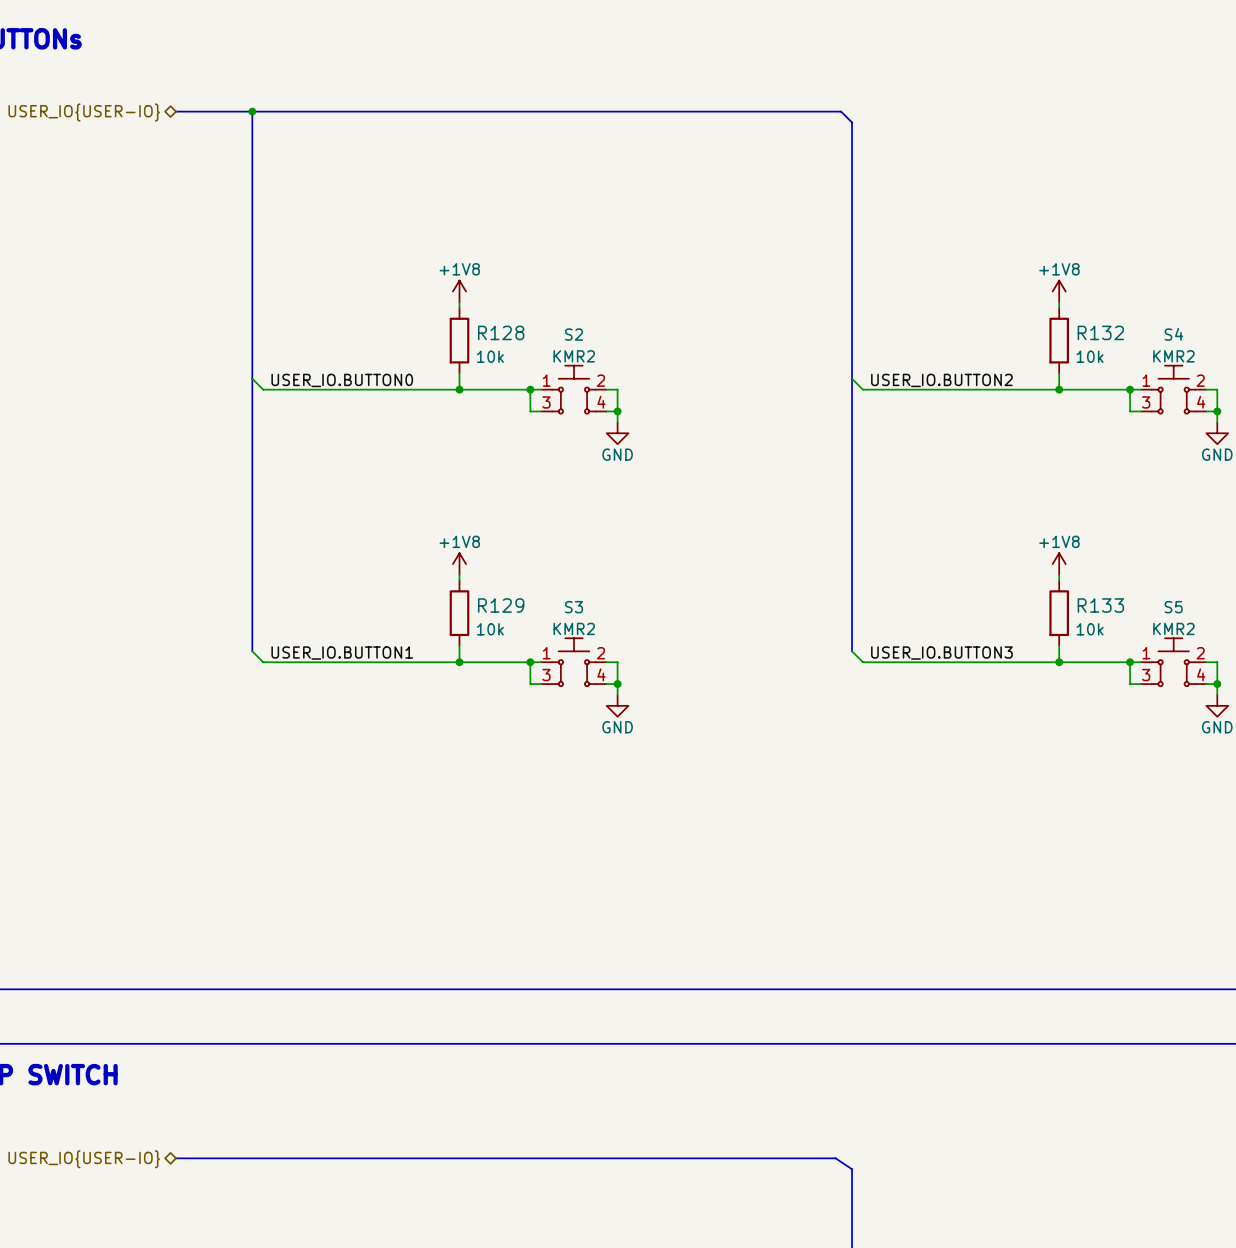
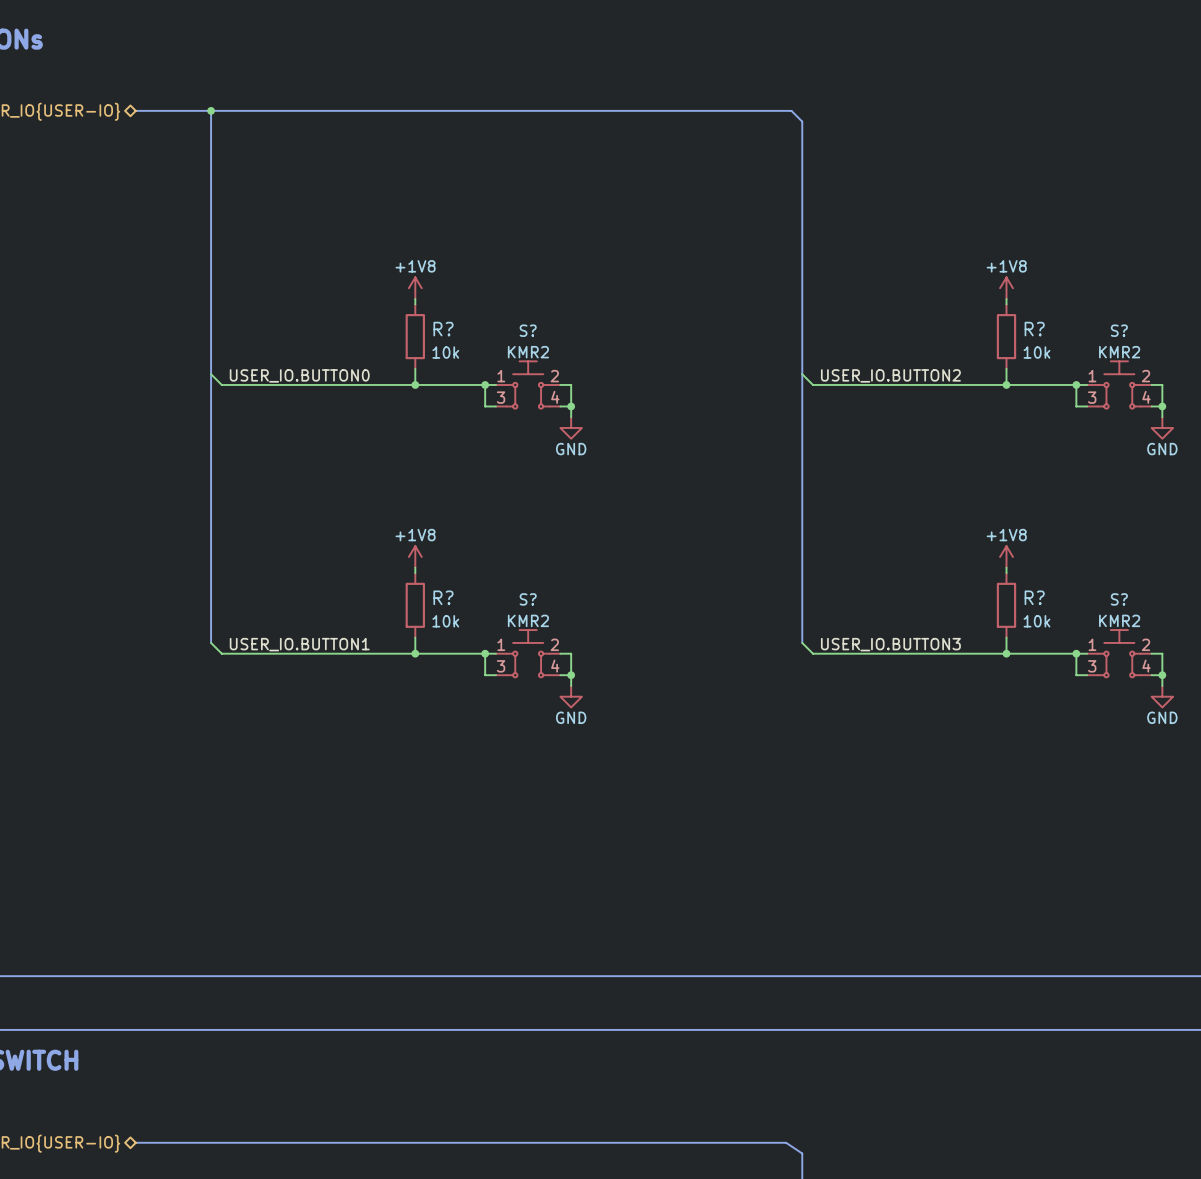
R128 name: R128 (501, 332) -> R? (443, 329)
R132 name: R132 (1100, 332) -> R? (1034, 329)
S2 name: S2 (573, 334) -> S? (528, 330)
S4 name: S4 (1173, 334) -> S? (1119, 330)
R129 name: R129 (501, 605) -> R? (443, 597)
R133 name: R133 (1100, 605) -> R? (1034, 597)
S3 name: S3 (573, 607) -> S? (528, 599)
S5 name: S5 (1173, 607) -> S? (1119, 599)

